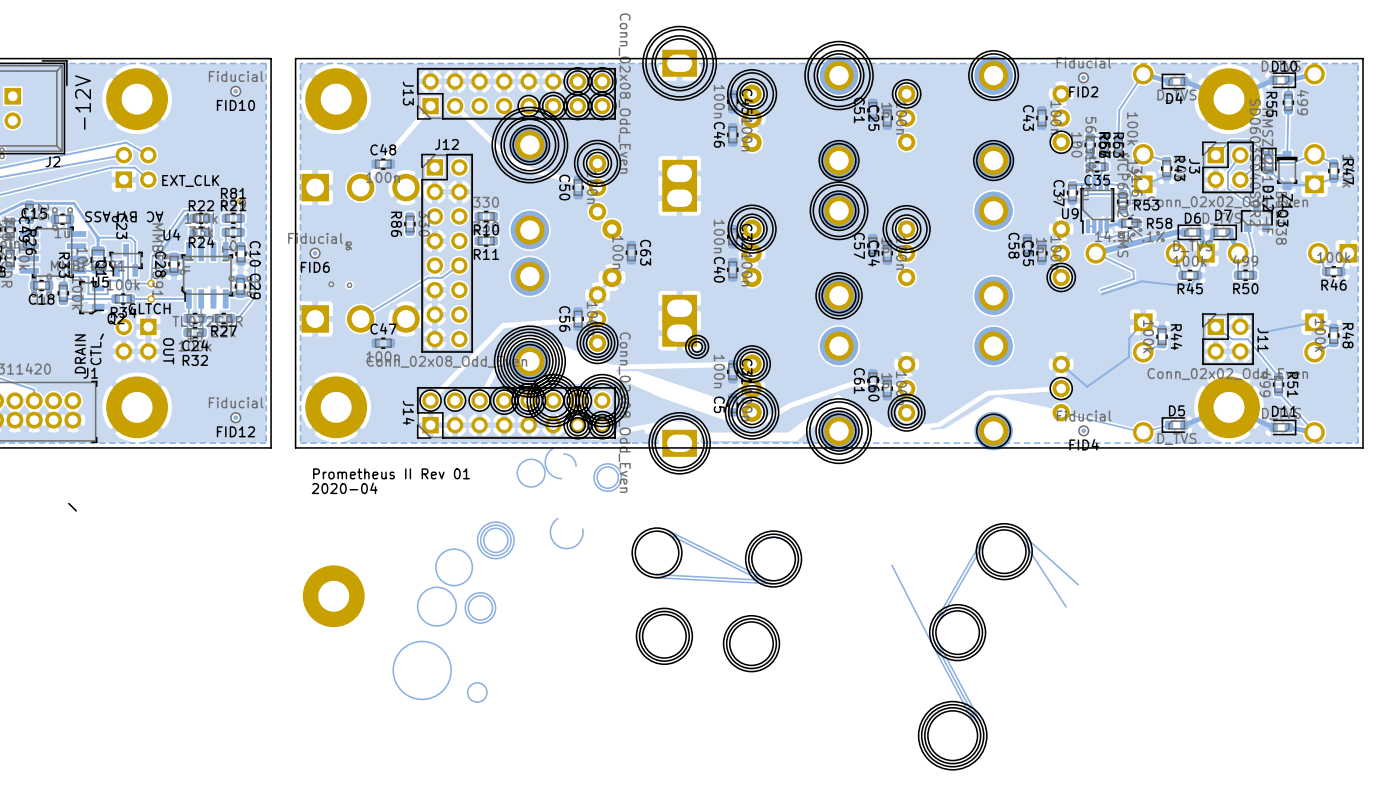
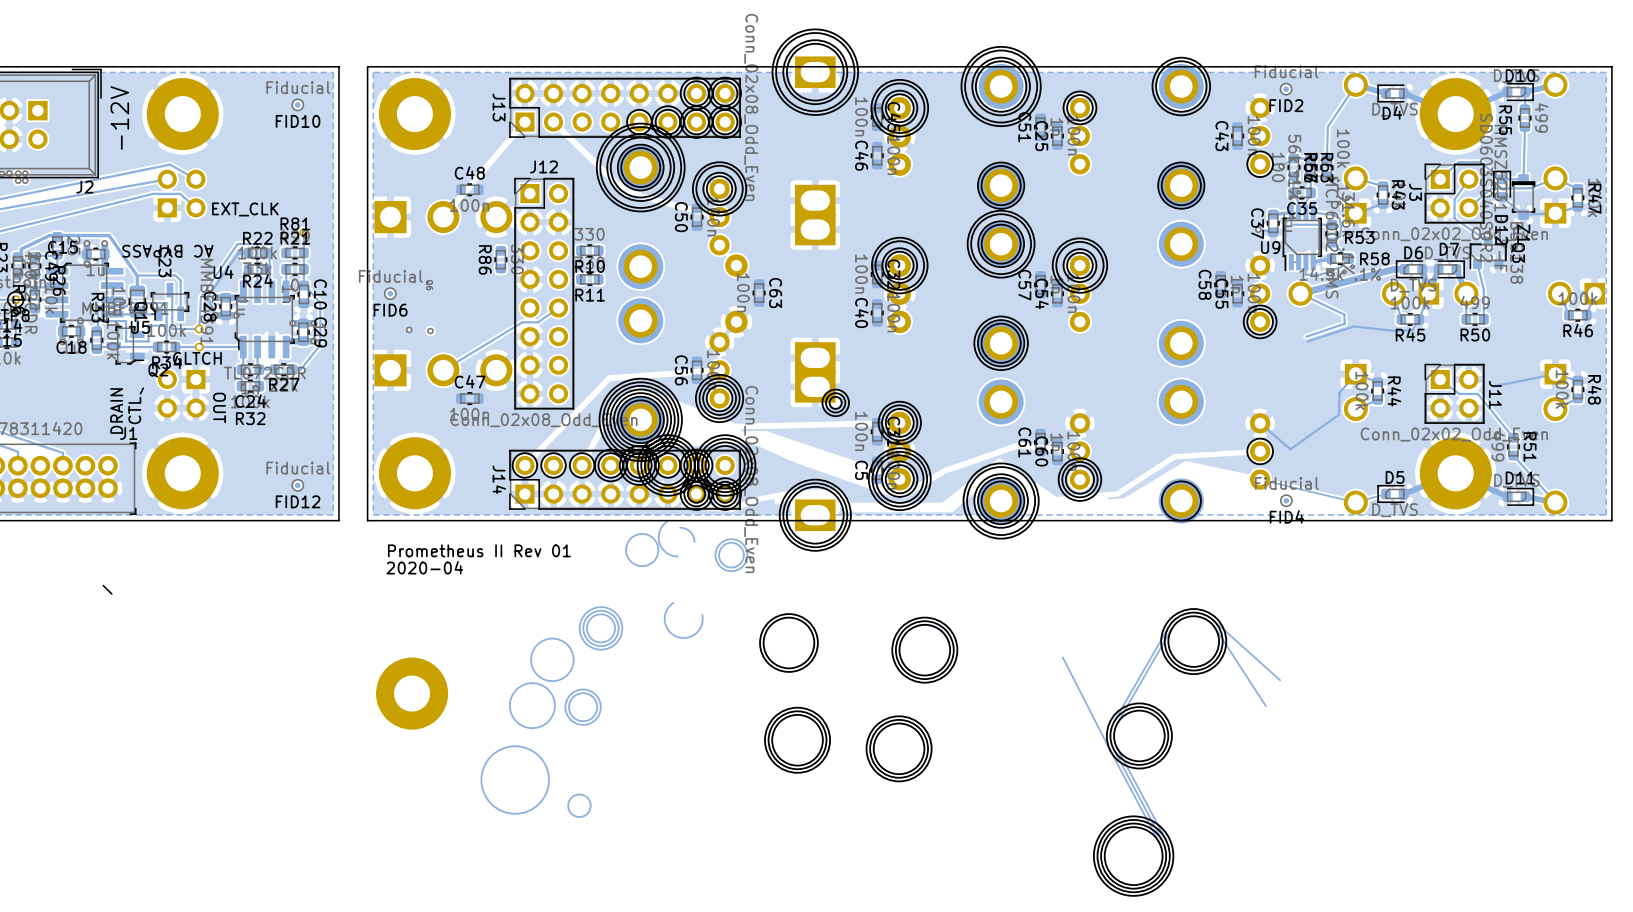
track: (668, 530) (763, 578) -> none
track: (666, 533) (762, 581) -> none
track: (655, 574) (772, 580) -> none
track: (655, 577) (772, 583) -> none

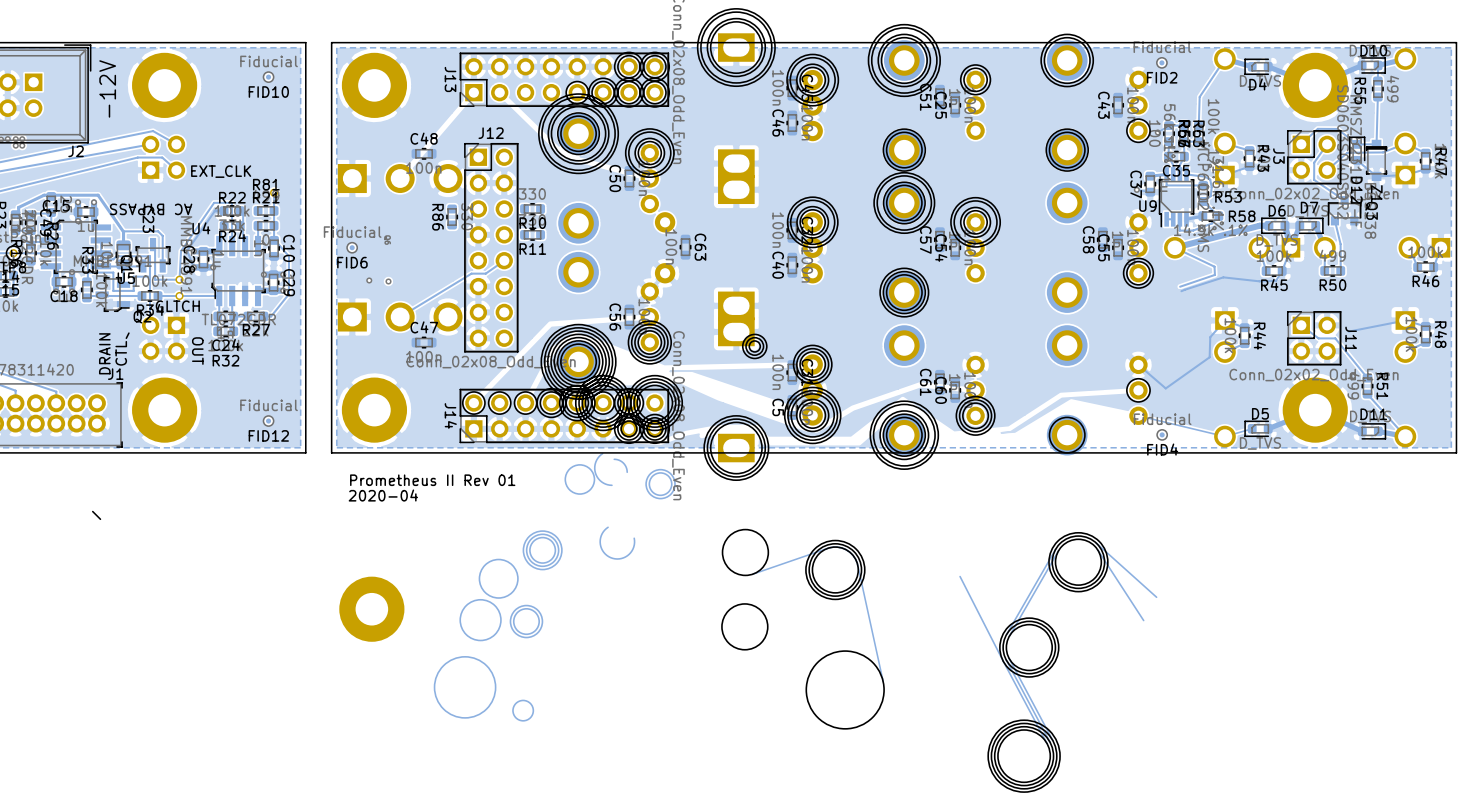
drawing: [759, 613, 819, 673] -> none
track: none -> (827, 548) (752, 574)
drawing position: (788, 643) -> (745, 552)
track: none -> (857, 565) (883, 681)
drawing: [764, 706, 831, 774] -> none
drawing: [865, 715, 933, 783] -> none
drawing: none -> [805, 650, 885, 730]
drawing position: (797, 740) -> (744, 626)

